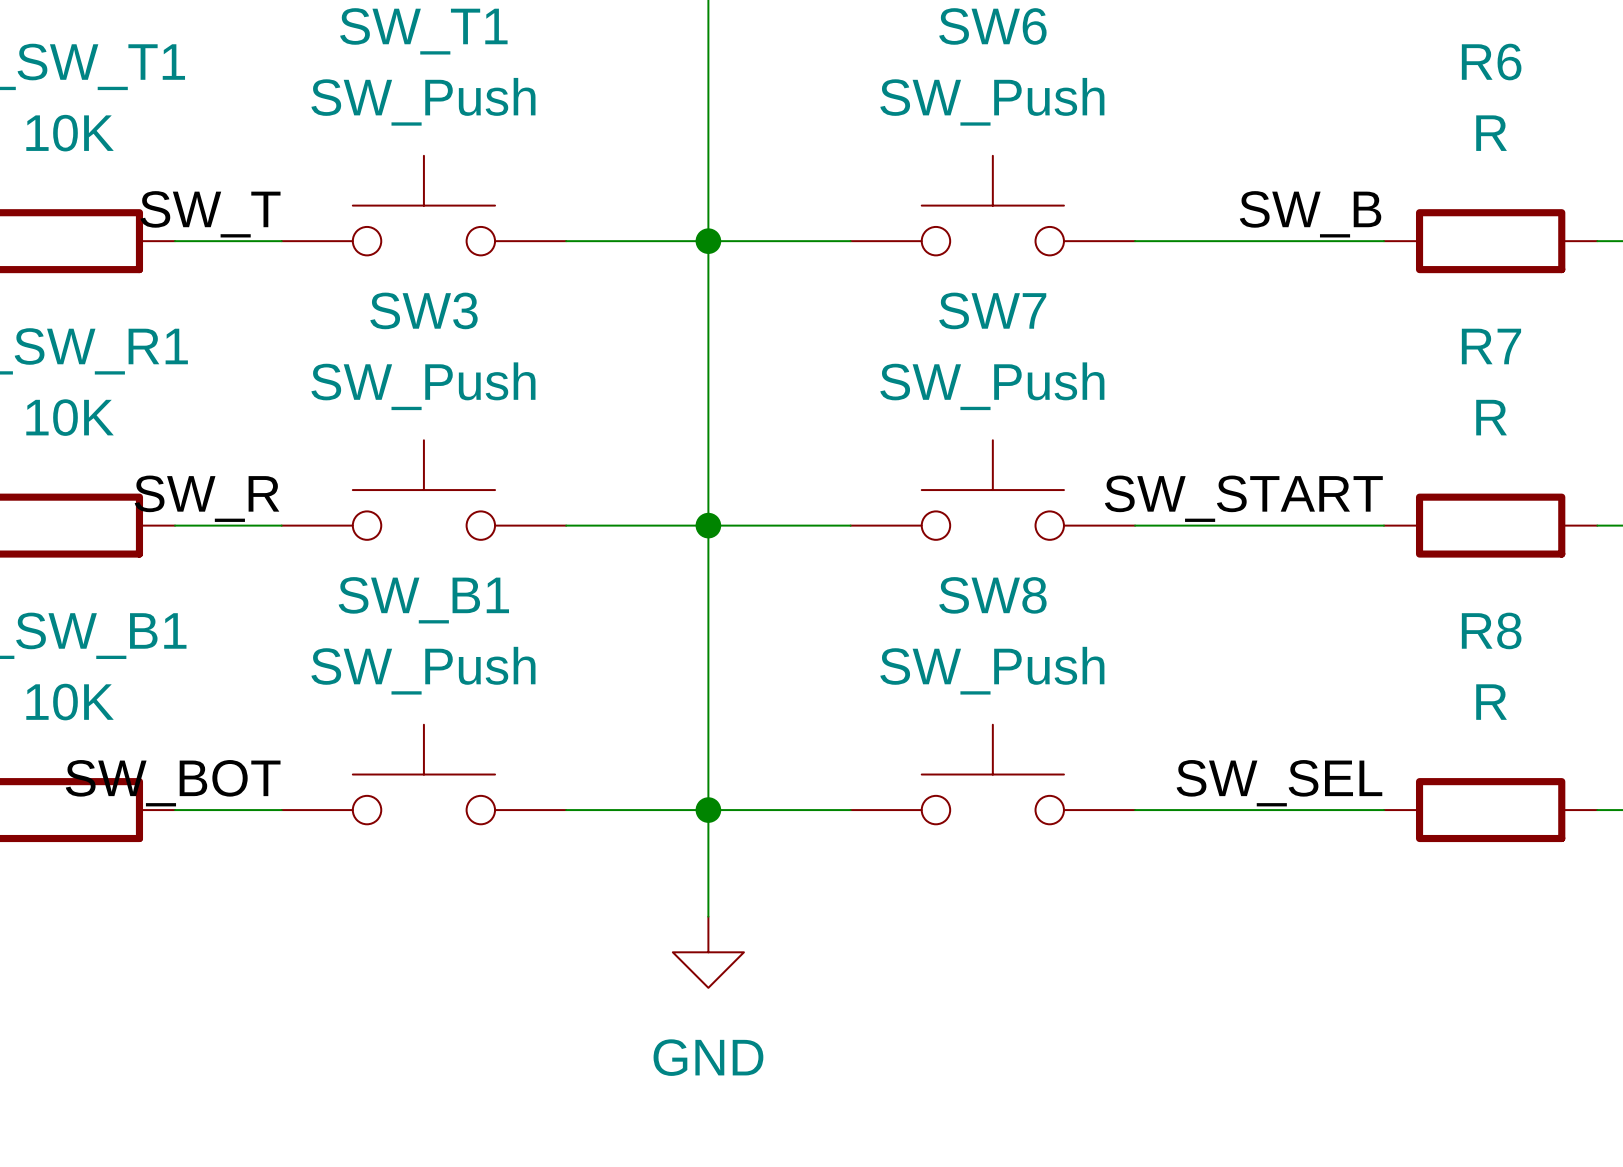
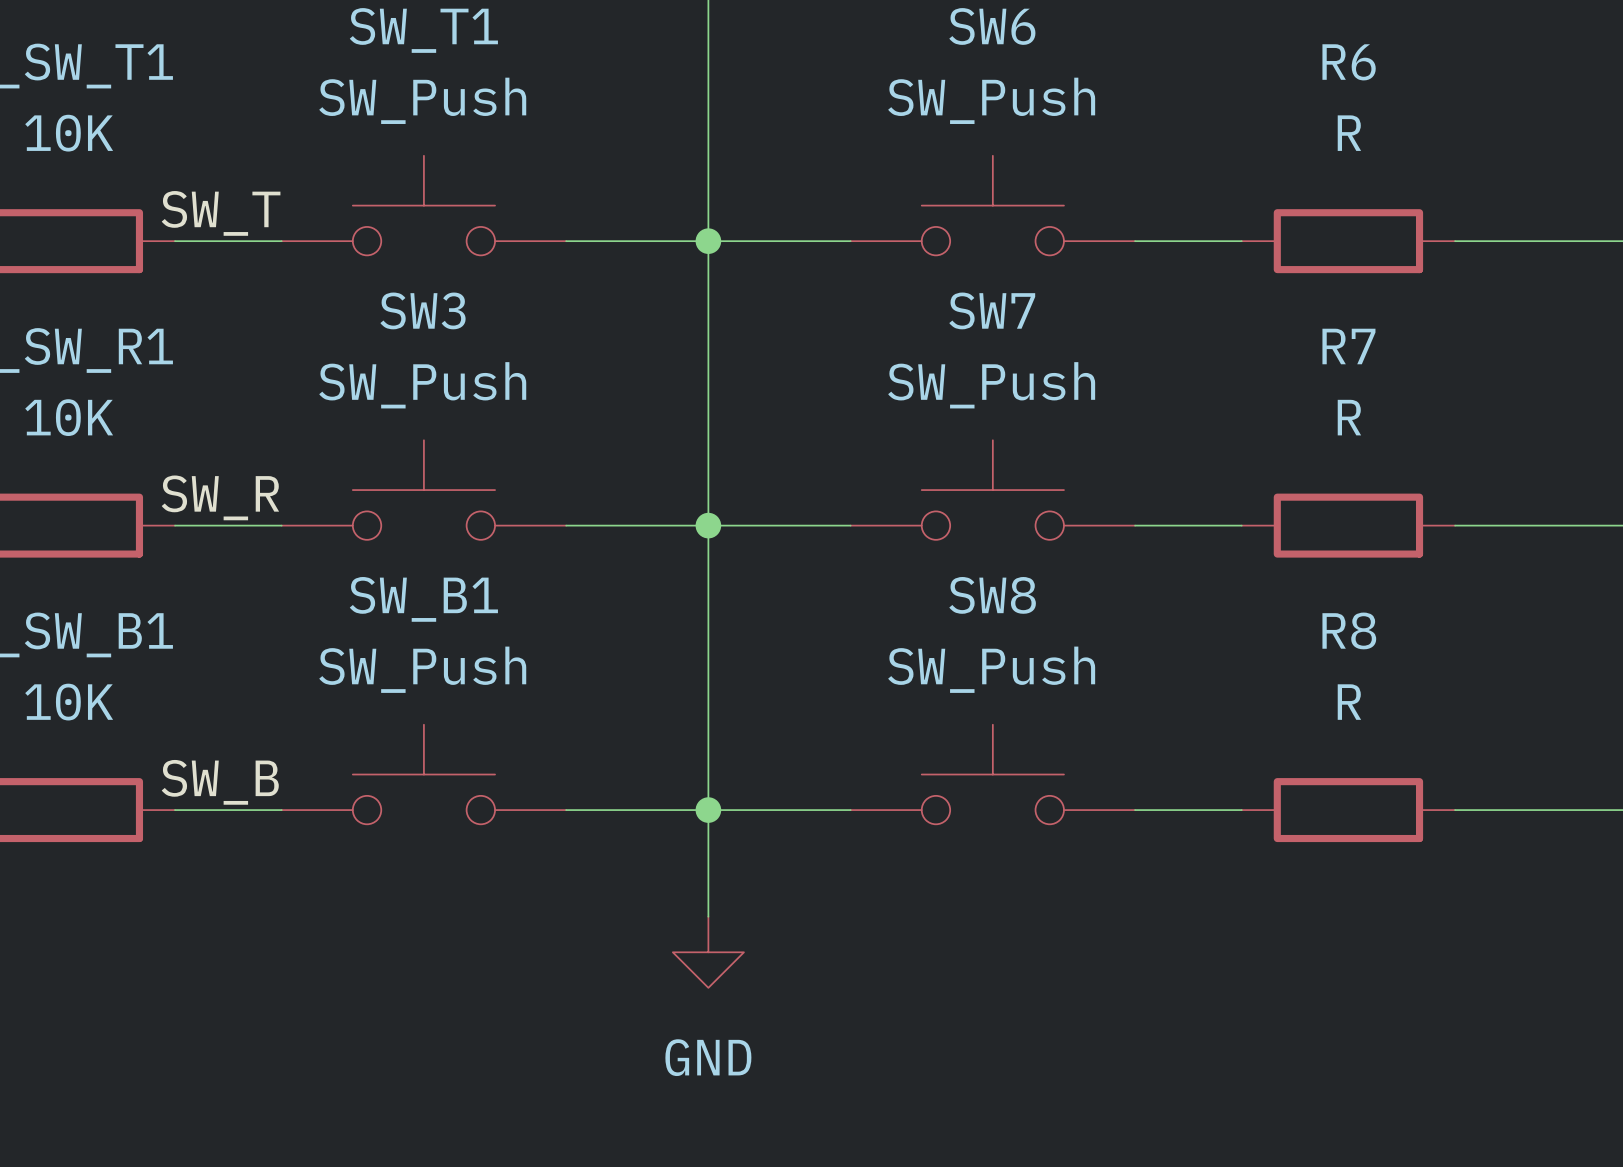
label: SW_B (1310, 214) -> none
wire: (1241, 241) (1383, 241) -> (1455, 241) (1597, 241)
R6 position: (1490, 241) -> (1348, 241)
label: SW_START (1243, 498) -> none
wire: (1241, 525) (1383, 525) -> (1455, 525) (1597, 525)
R7 position: (1490, 525) -> (1348, 525)
label: SW_BOT (173, 783) -> SW_B (220, 782)
label: SW_SEL (1279, 783) -> none
wire: (1241, 810) (1383, 810) -> (1455, 810) (1597, 810)
R8 position: (1490, 810) -> (1348, 810)

